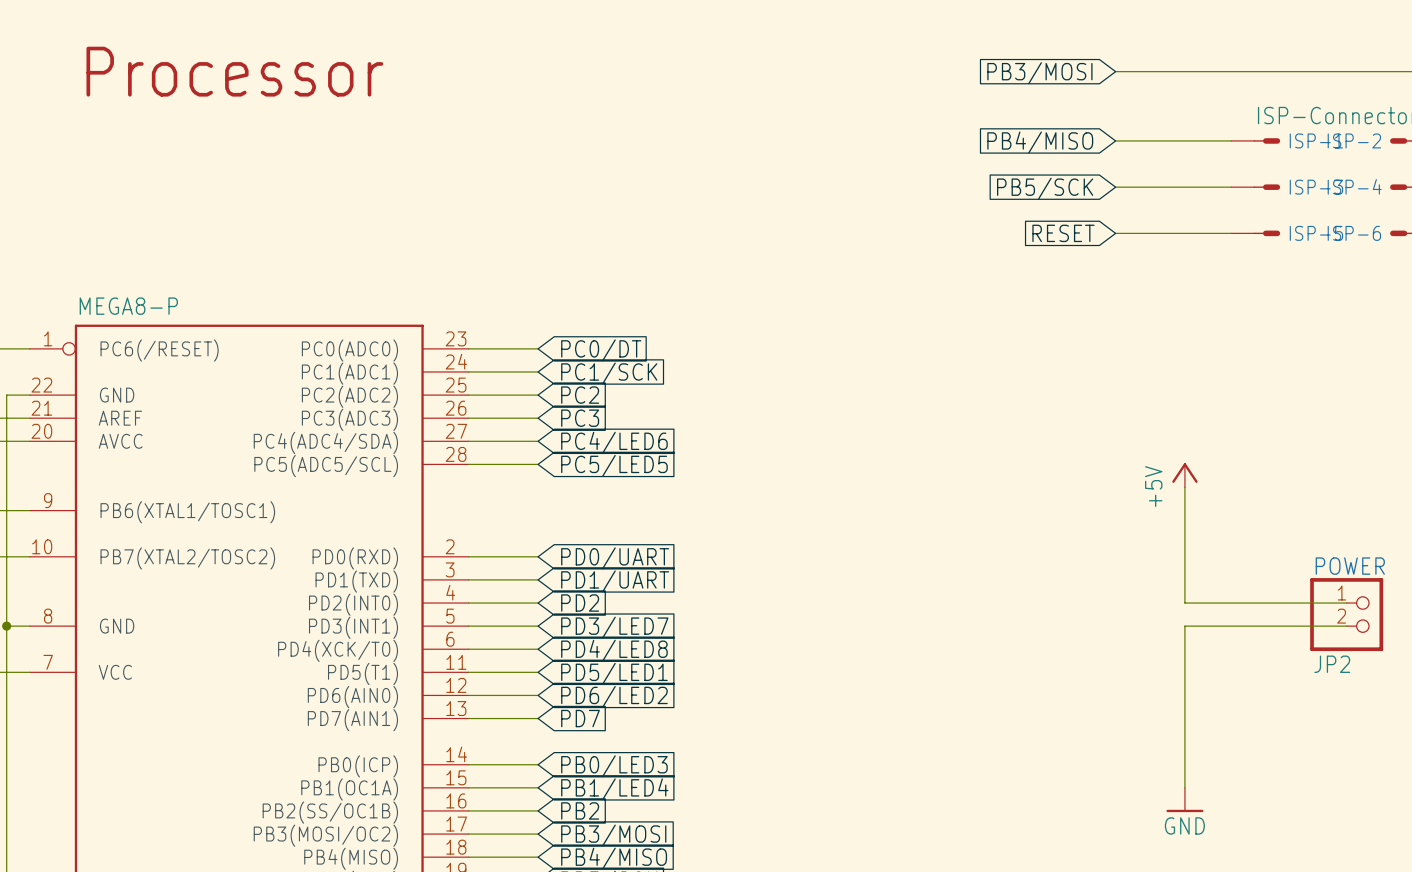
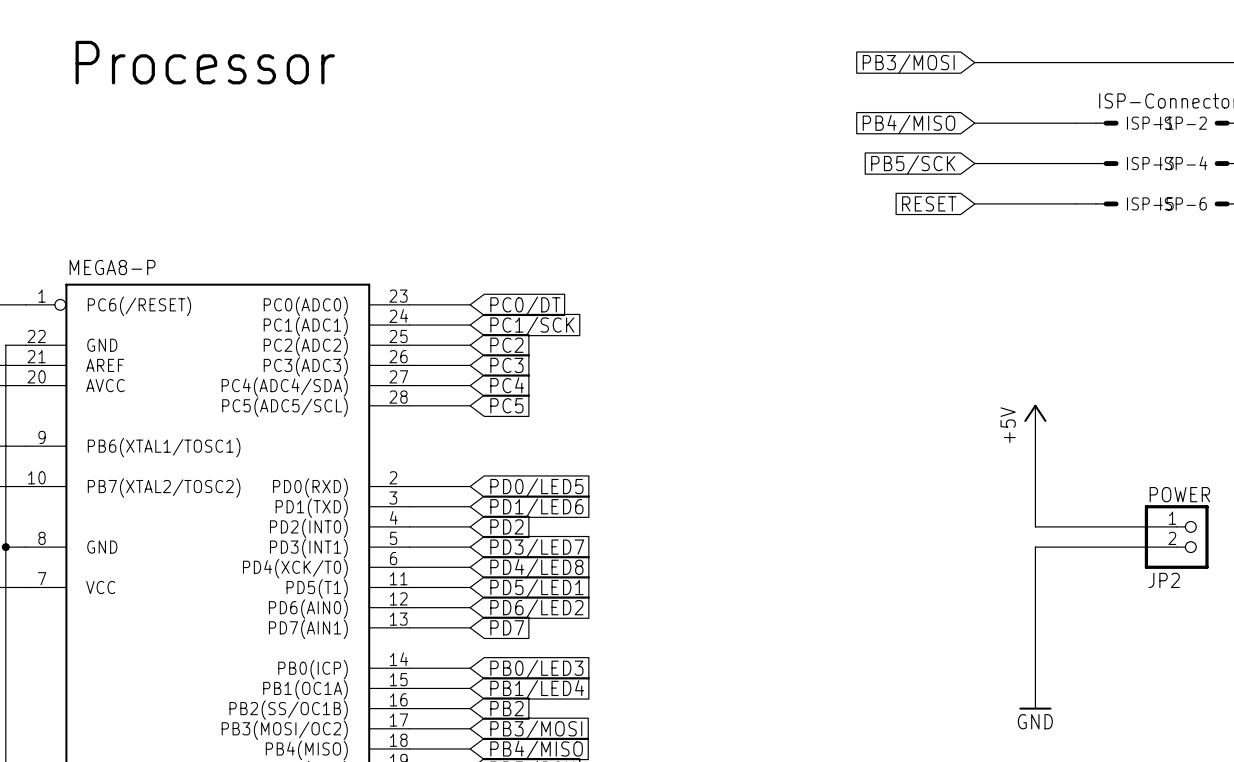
global label: PC4/LED6 (614, 442) -> PC4 (507, 385)
global label: PC5/LED5 (614, 465) -> PC5 (506, 405)
global label: PD0/UART (615, 558) -> PD0/LED5 (536, 487)
global label: PD1/UART (615, 581) -> PD1/LED6 (536, 508)

